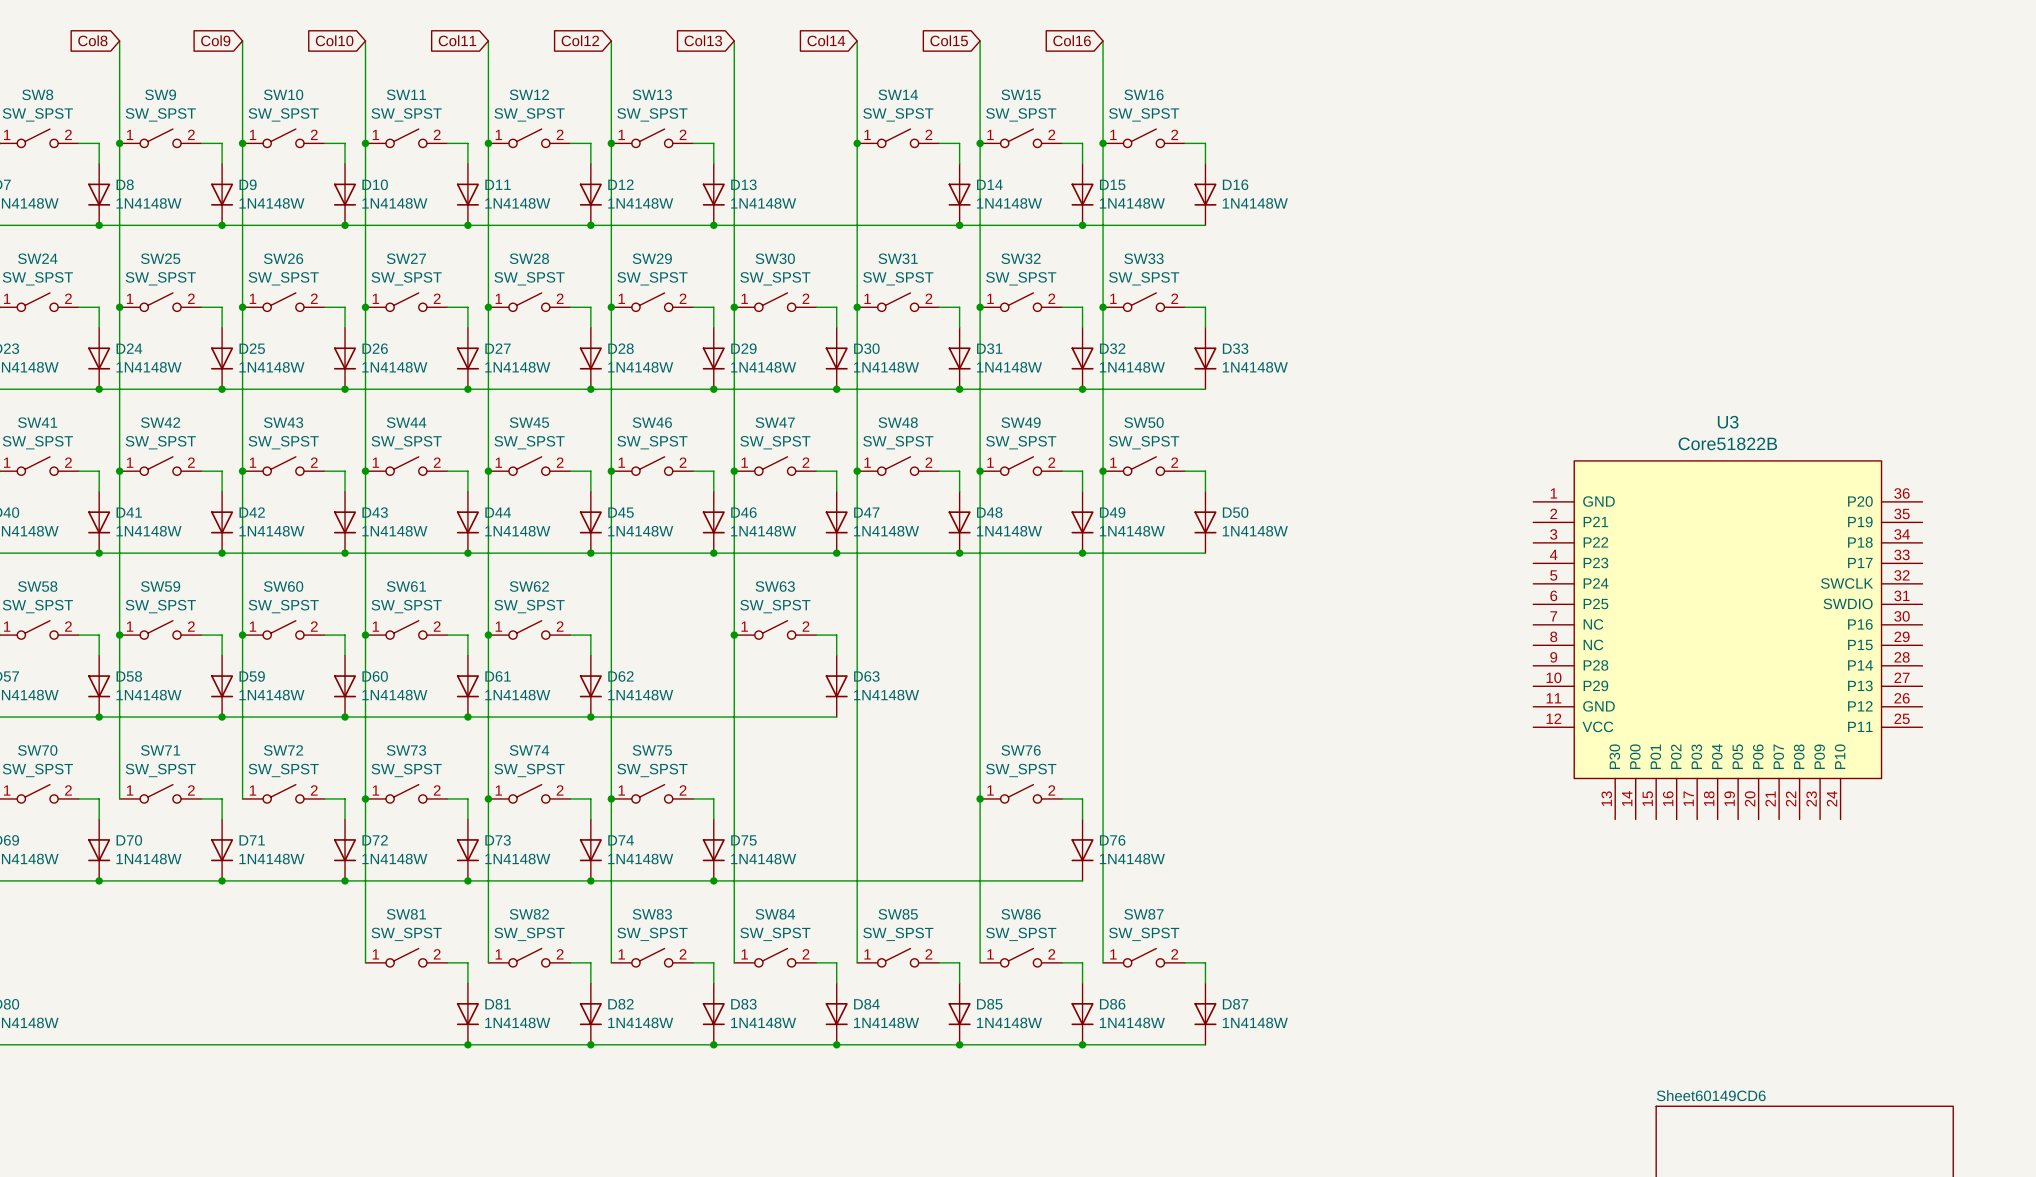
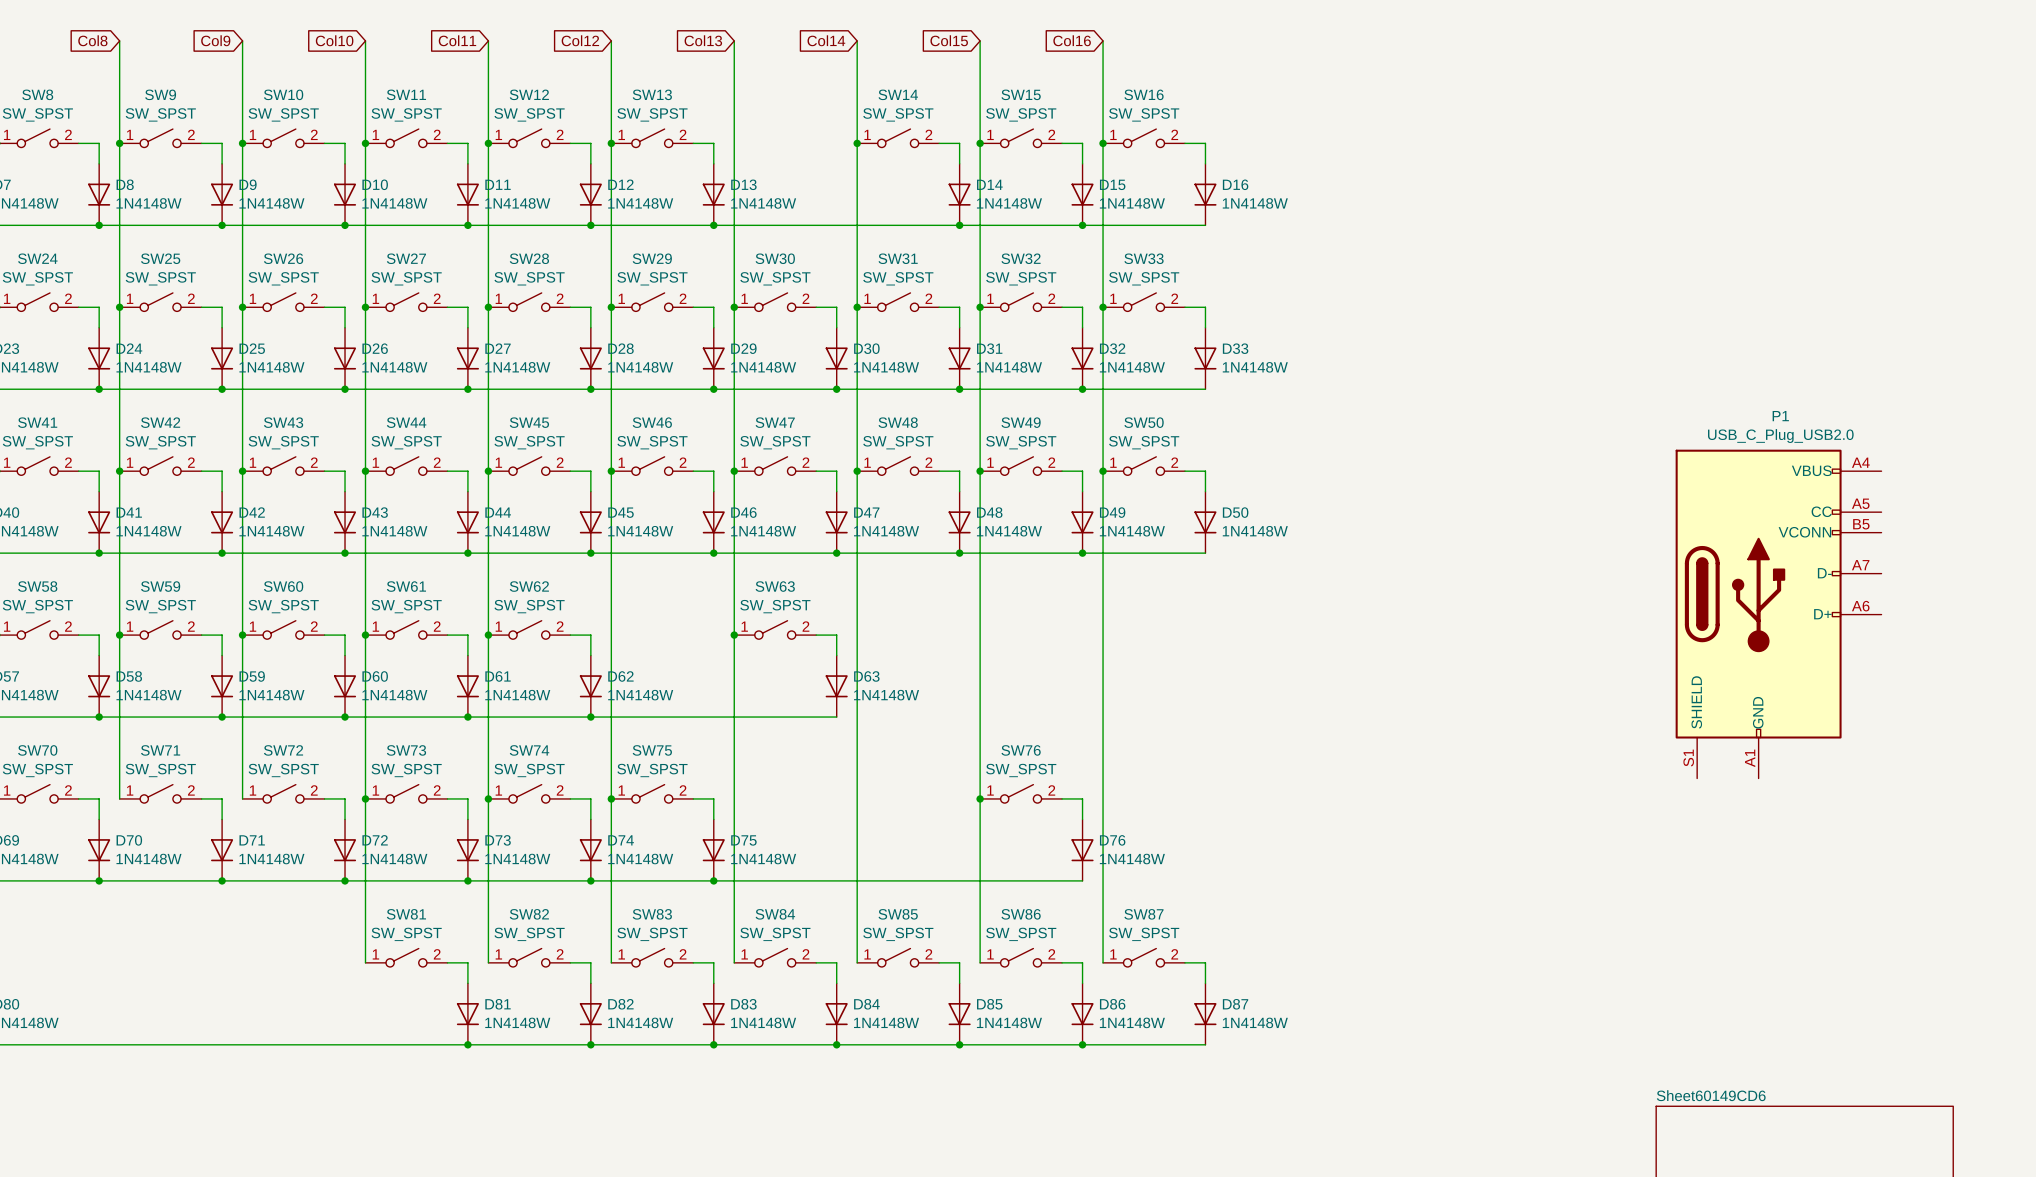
P1: none -> USB_C_Plug_USB2.0 (1778, 614)
U3: Core51822B (1727, 640) -> none

